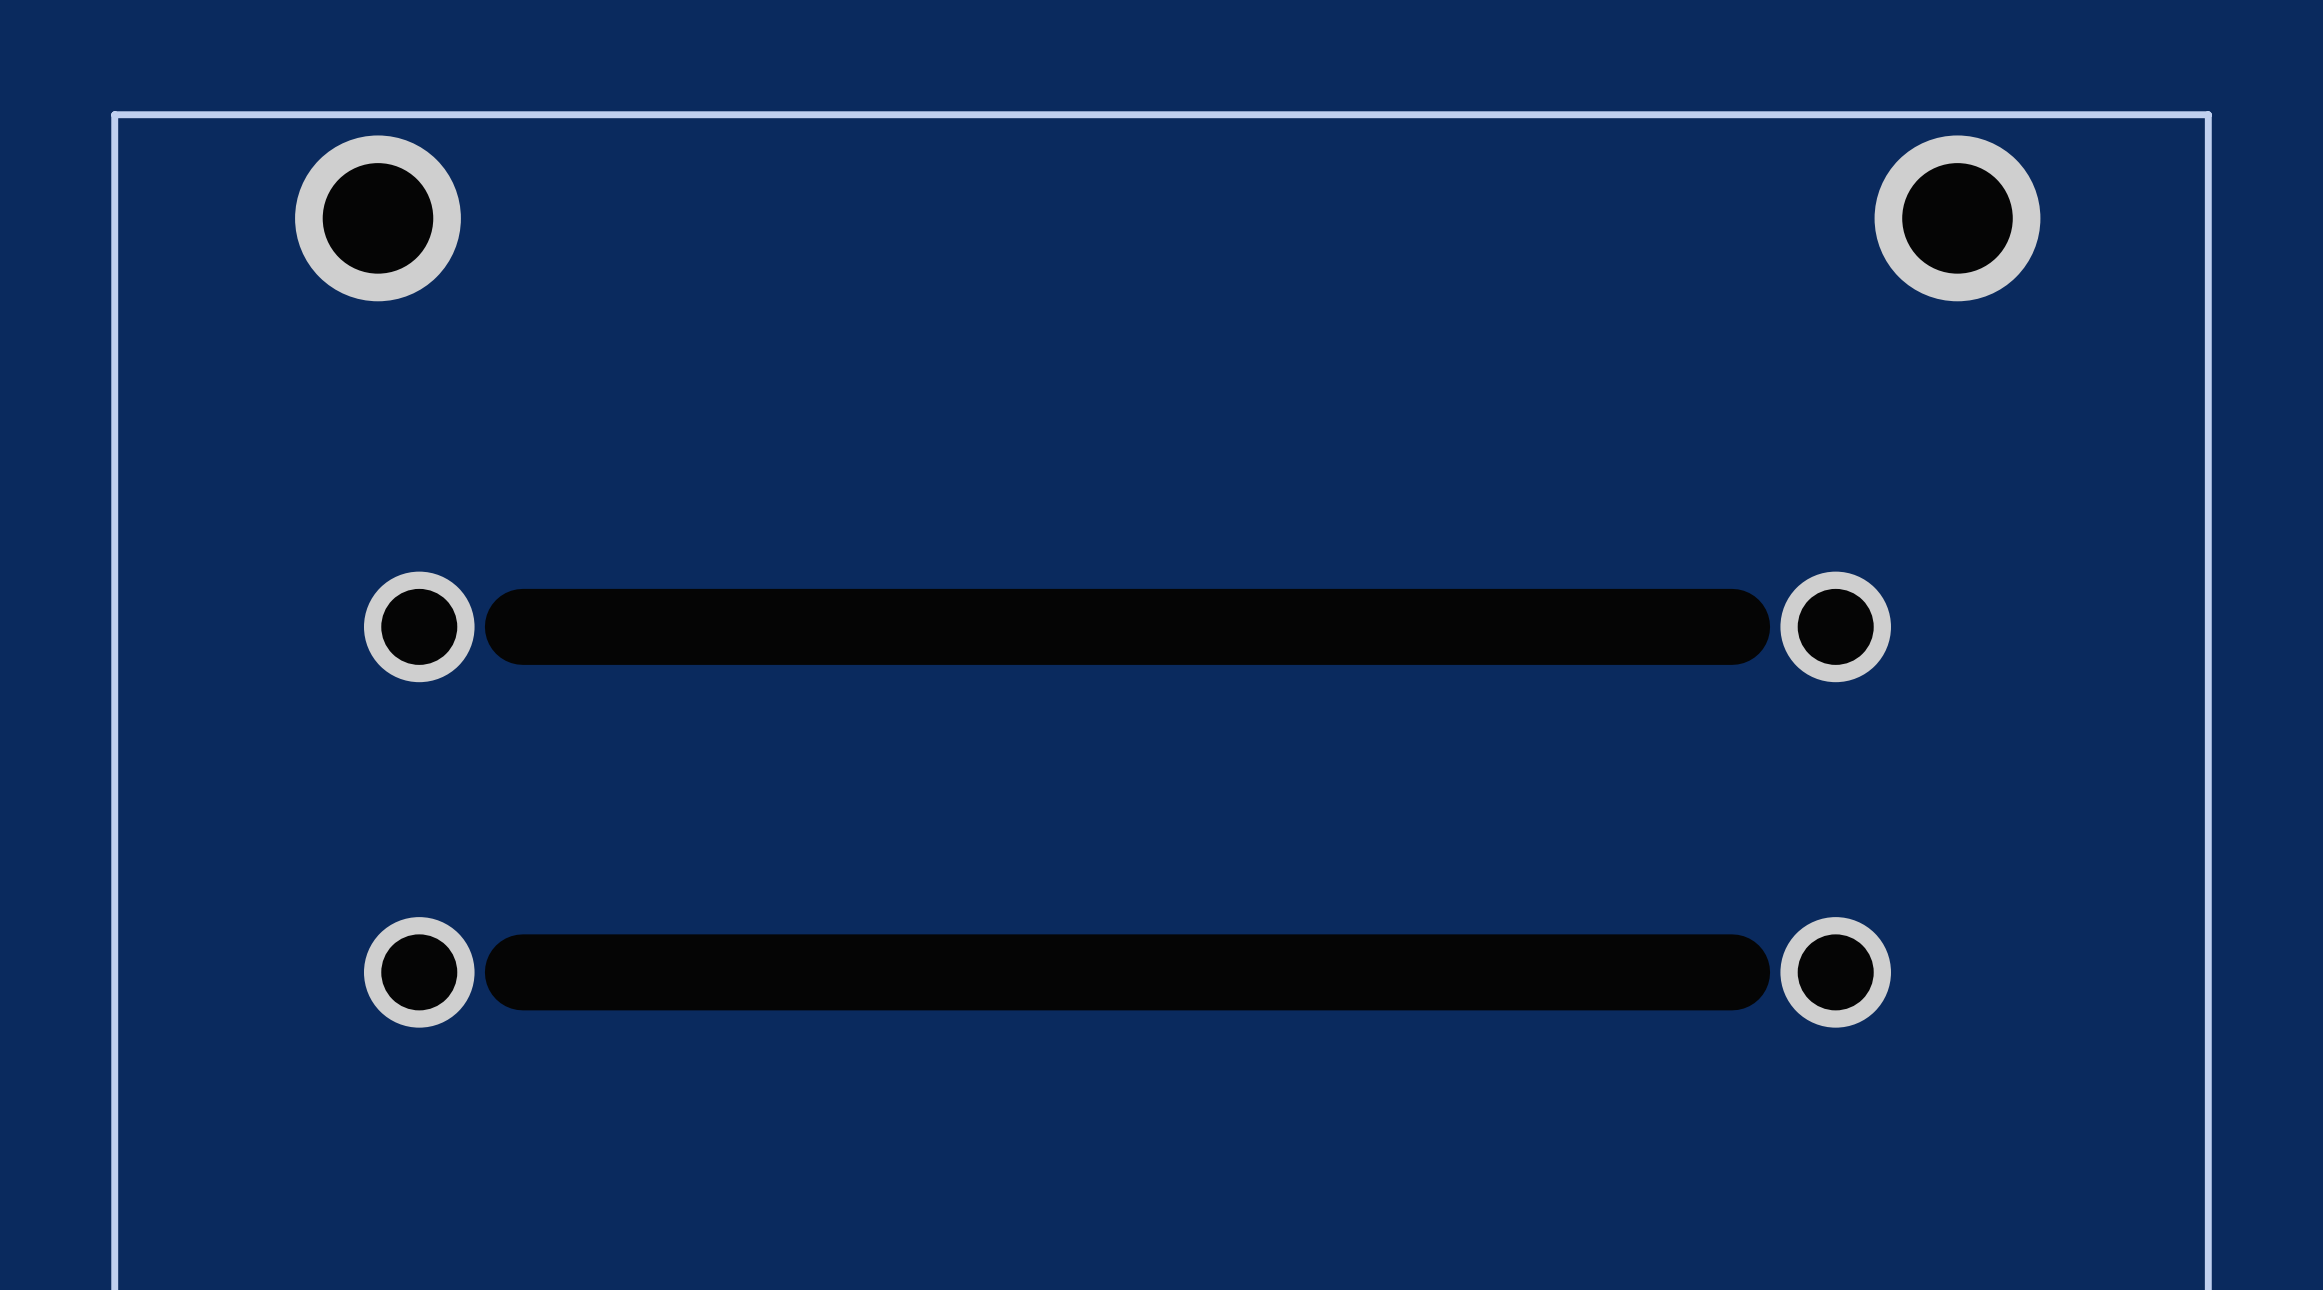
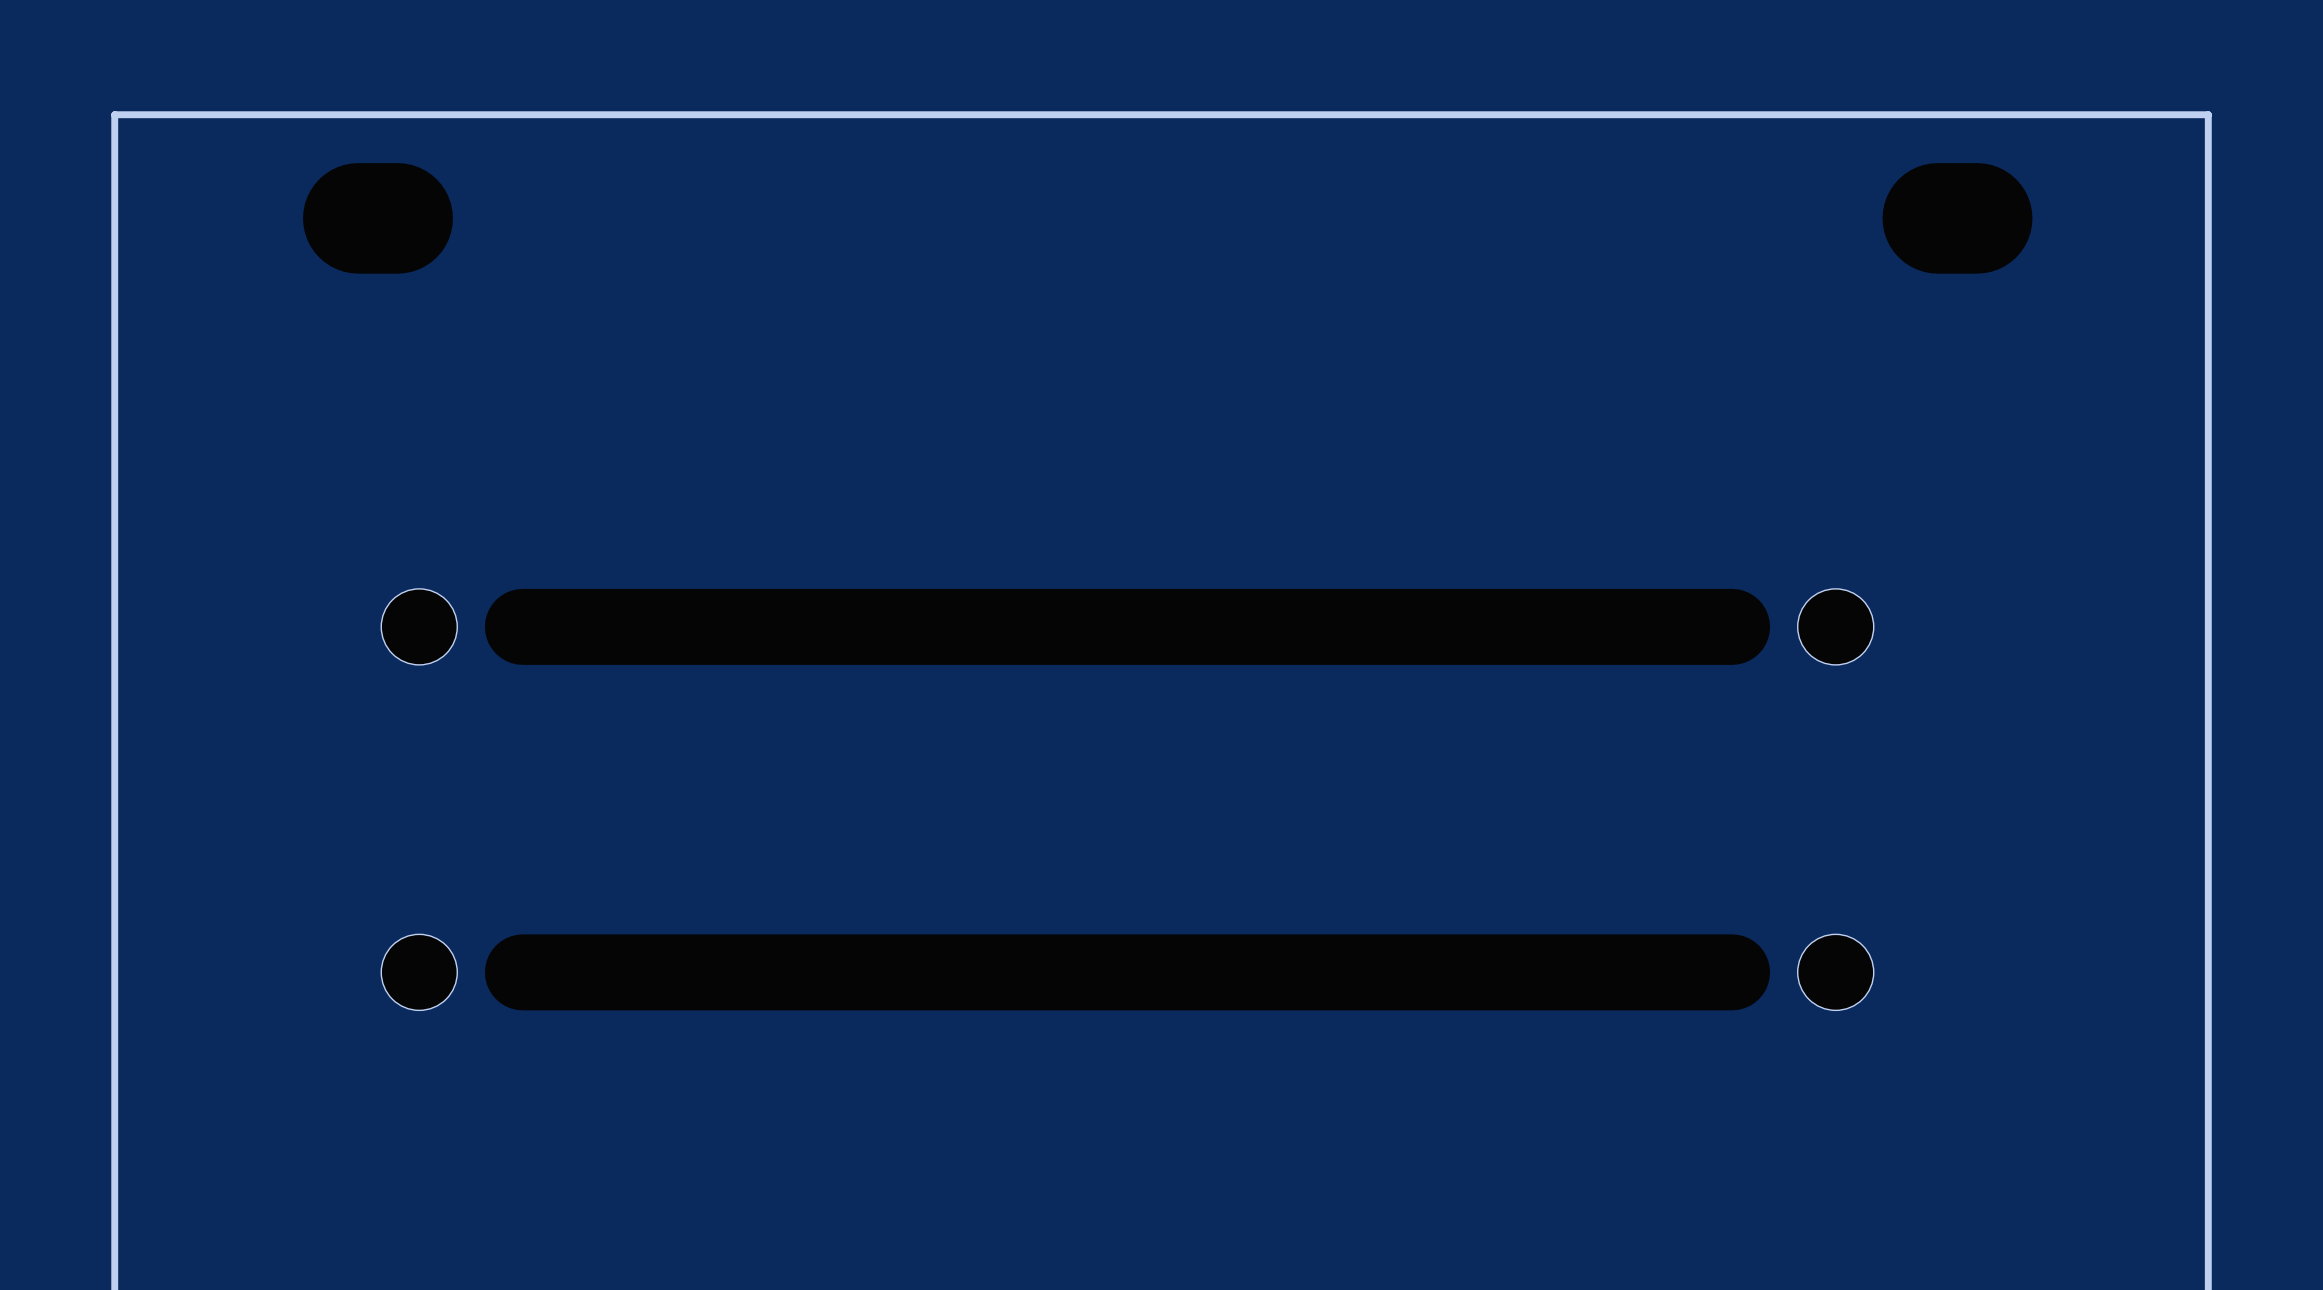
part footprint: [295, 135, 461, 302] -> [303, 163, 453, 274]
part footprint: [1874, 135, 2041, 302] -> [1882, 163, 2033, 274]
part footprint: [363, 571, 1891, 683] -> [381, 588, 1874, 665]
part footprint: [363, 917, 1891, 1028] -> [381, 934, 1874, 1011]

